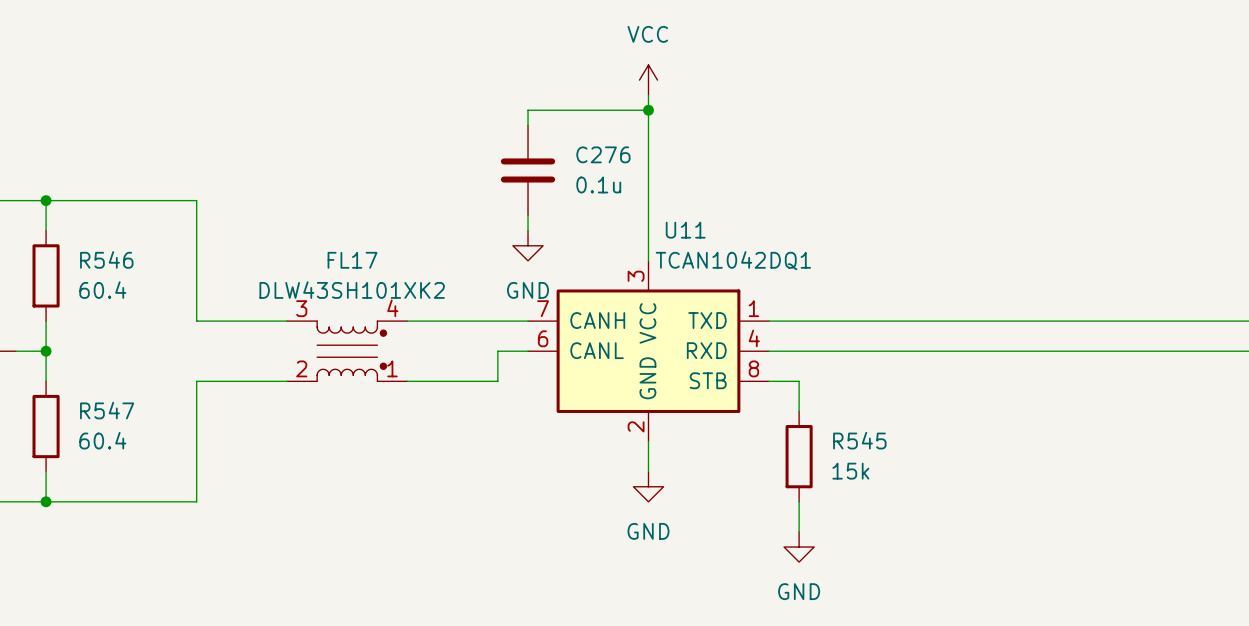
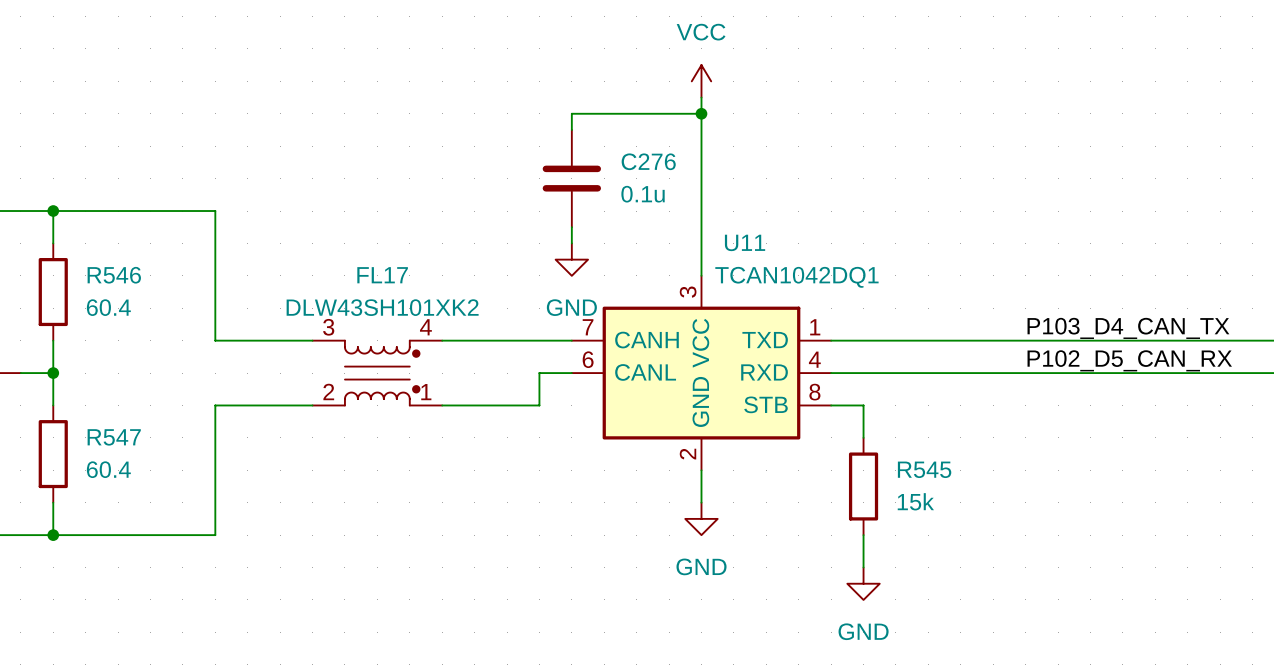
label: none -> P103_D4_CAN_TX (1128, 328)
label: none -> P102_D5_CAN_RX (1129, 360)

